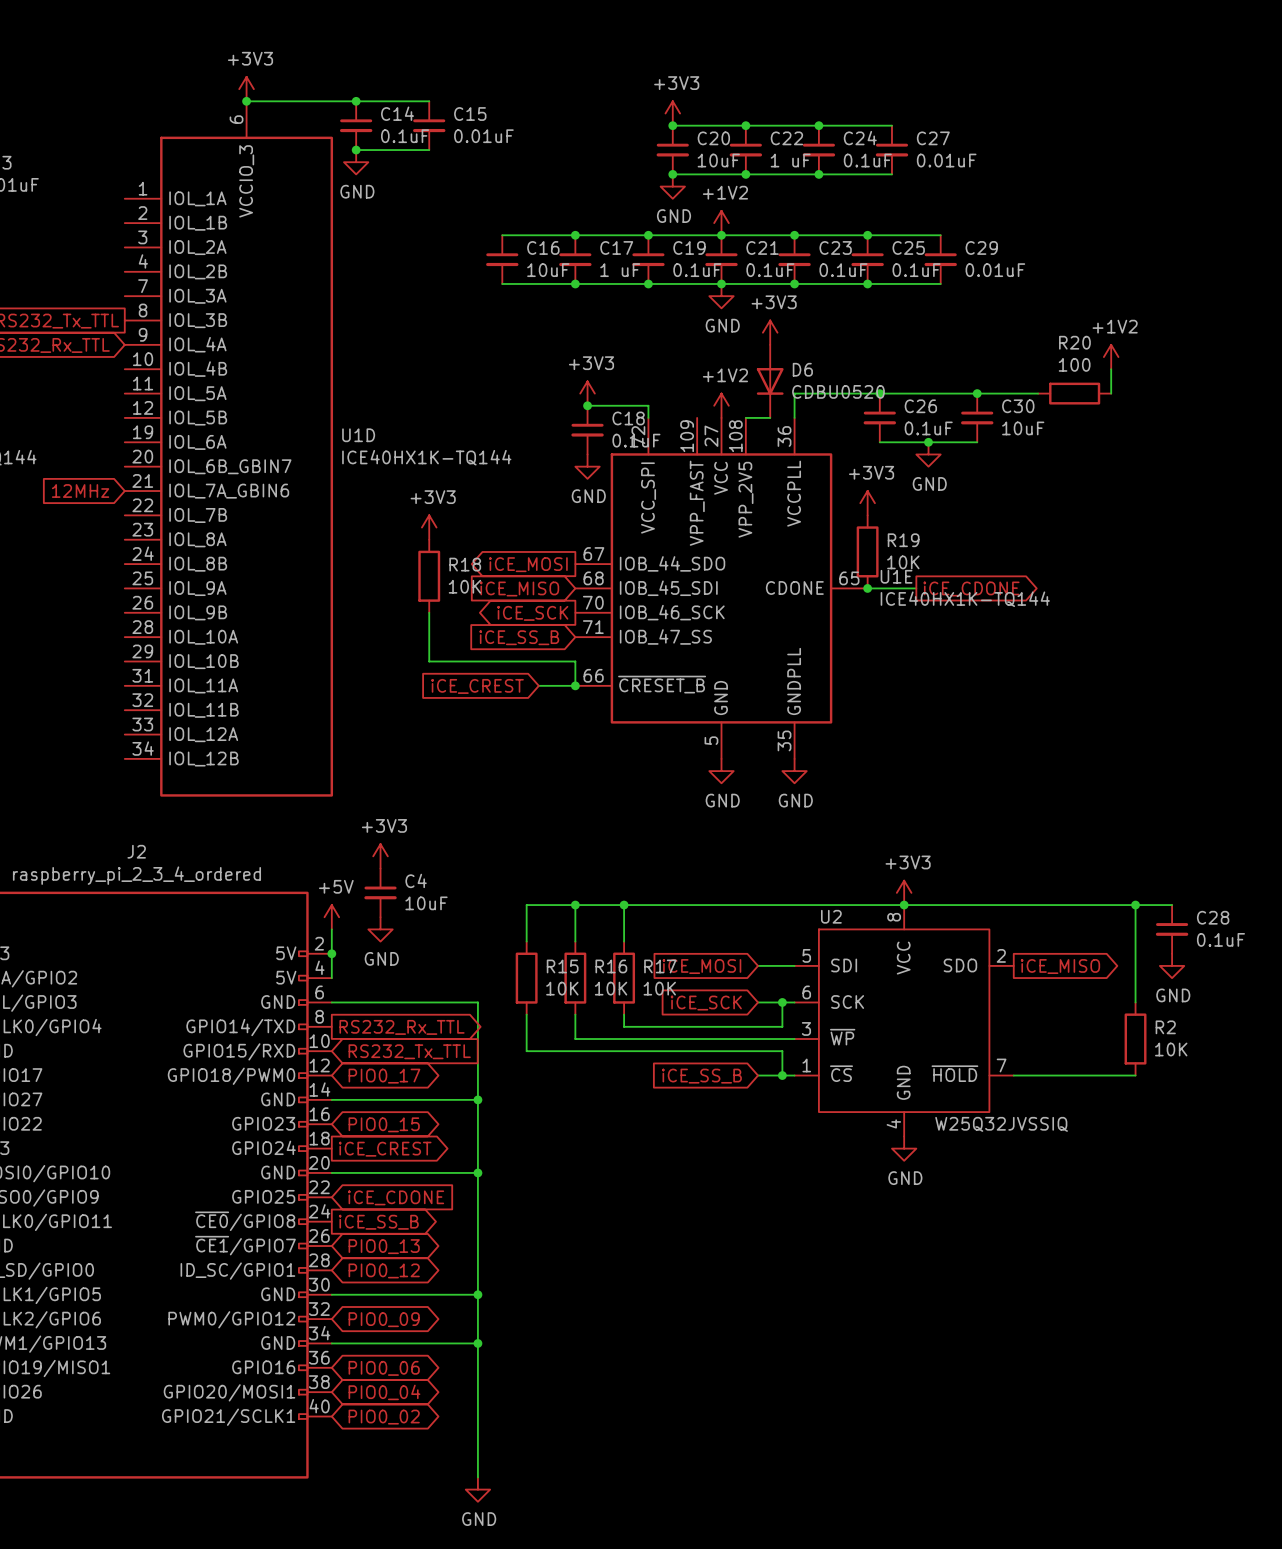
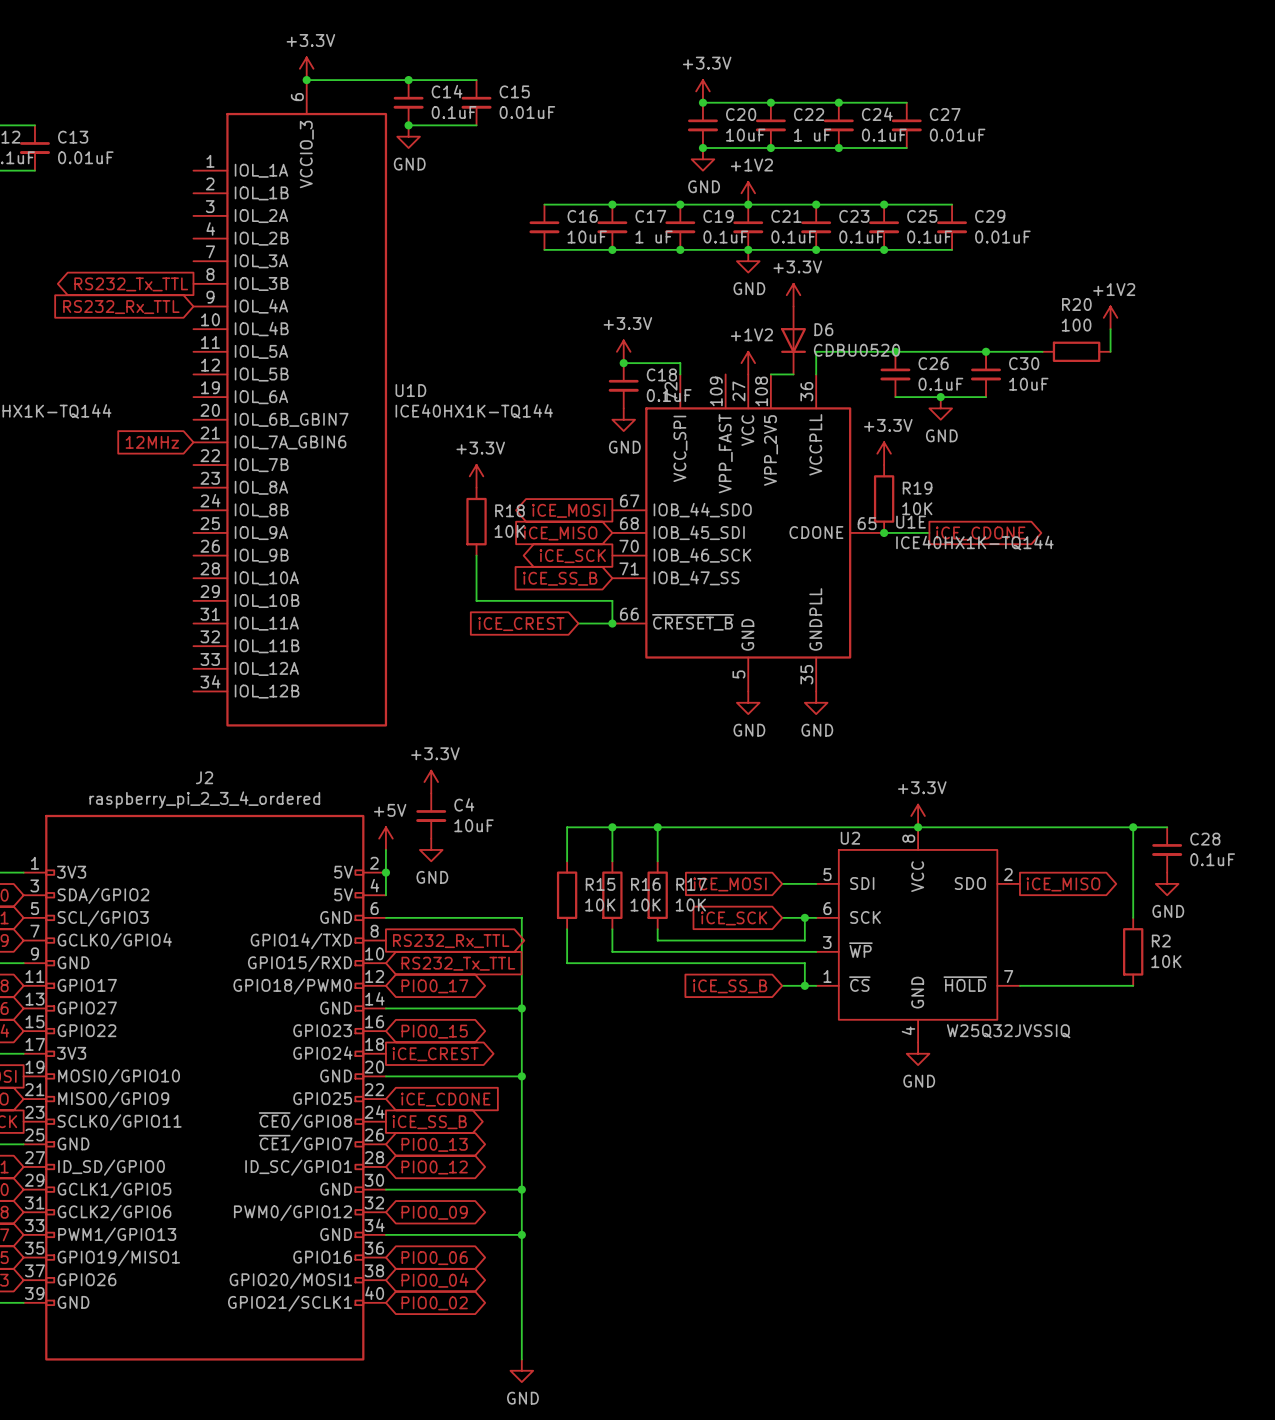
power symbol: +3V3 (246, 89) -> +3.3V (306, 68)
power symbol: +3V3 (672, 113) -> +3.3V (702, 91)
power symbol: +3V3 (770, 332) -> +3.3V (793, 295)
power symbol: +3V3 (587, 393) -> +3.3V (623, 351)
power symbol: +3V3 (867, 503) -> +3.3V (884, 453)
power symbol: +3V3 (429, 527) -> +3.3V (476, 476)
power symbol: +3V3 (380, 856) -> +3.3V (431, 782)
power symbol: +3V3 (904, 892) -> +3.3V (918, 816)

